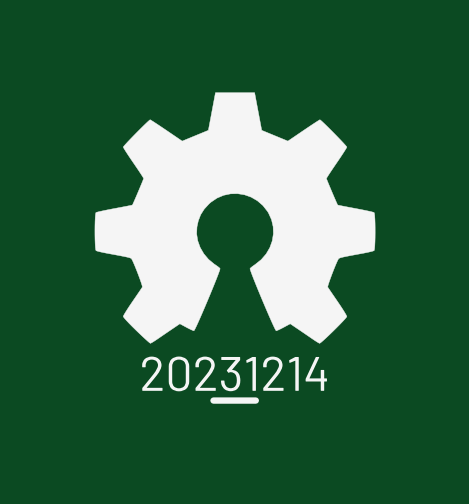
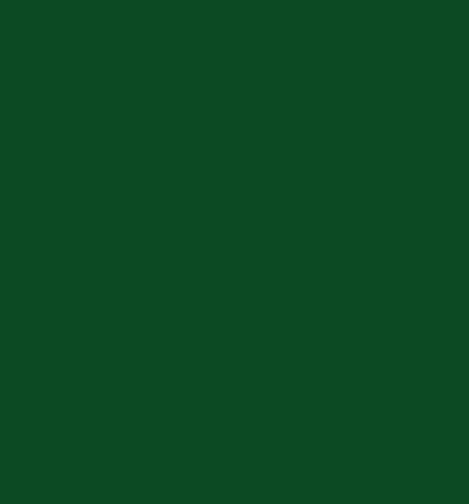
drawing: [94, 92, 376, 404] -> none

